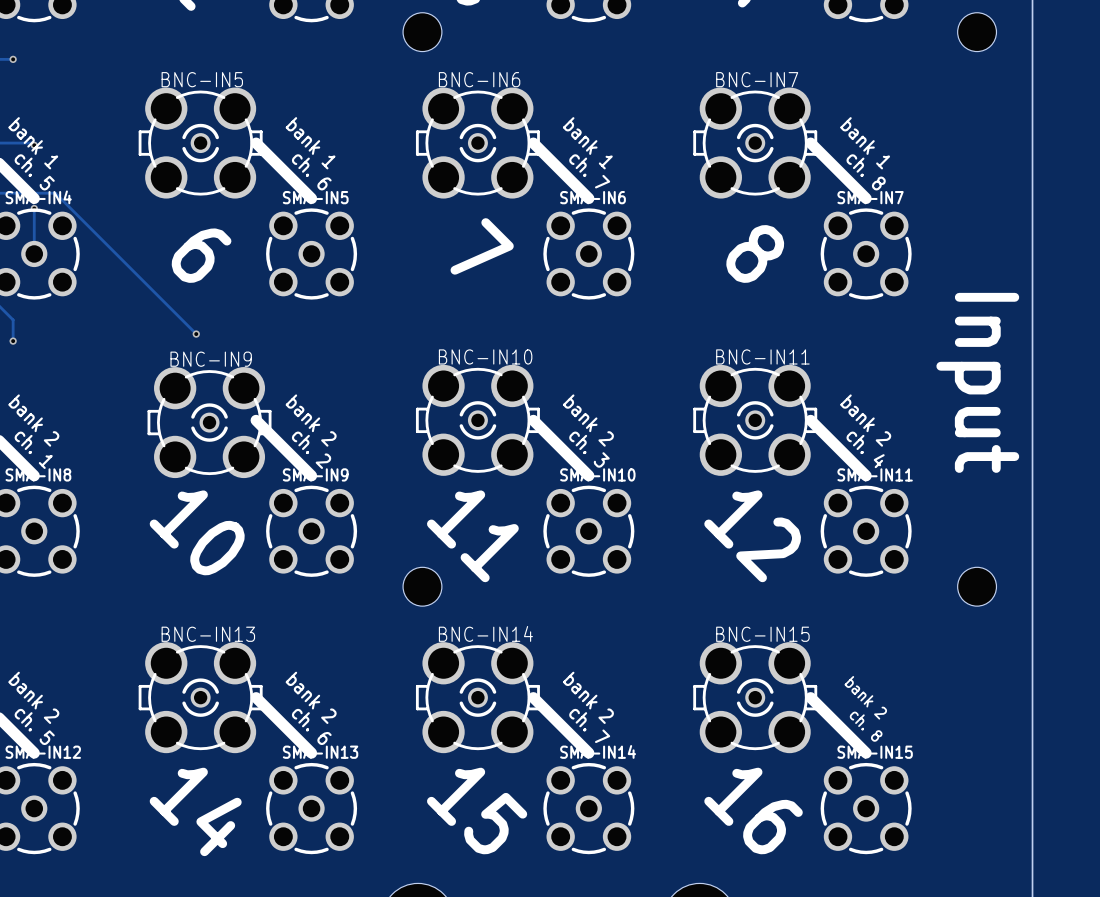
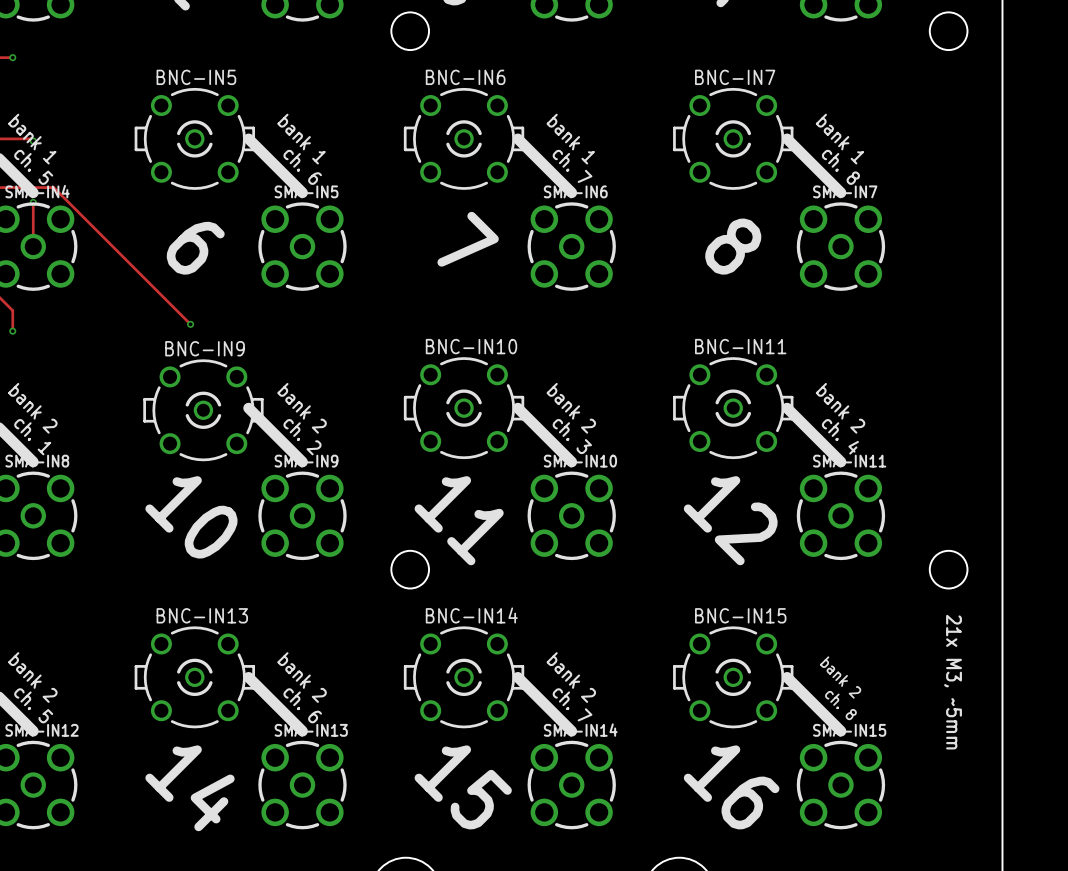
BNC-IN5 footprint: [138, 87, 263, 199] -> [134, 87, 255, 190]
BNC-IN6 footprint: [415, 87, 540, 199] -> [403, 87, 525, 190]
BNC-IN7 footprint: [693, 87, 818, 199] -> [673, 87, 794, 190]
BNC-IN10 footprint: [415, 364, 540, 476] -> [403, 357, 525, 460]
BNC-IN11 footprint: [693, 364, 818, 476] -> [673, 357, 794, 460]
BNC-IN9 footprint: [147, 367, 272, 479] -> [143, 359, 264, 462]
text: Input (977, 382) -> none
BNC-IN13 footprint: [138, 642, 263, 754] -> [134, 626, 255, 729]
BNC-IN14 footprint: [415, 642, 540, 754] -> [403, 626, 525, 729]
BNC-IN15 footprint: [693, 642, 818, 754] -> [673, 626, 794, 729]
text: none -> 21x M3, ~5mm (953, 682)

